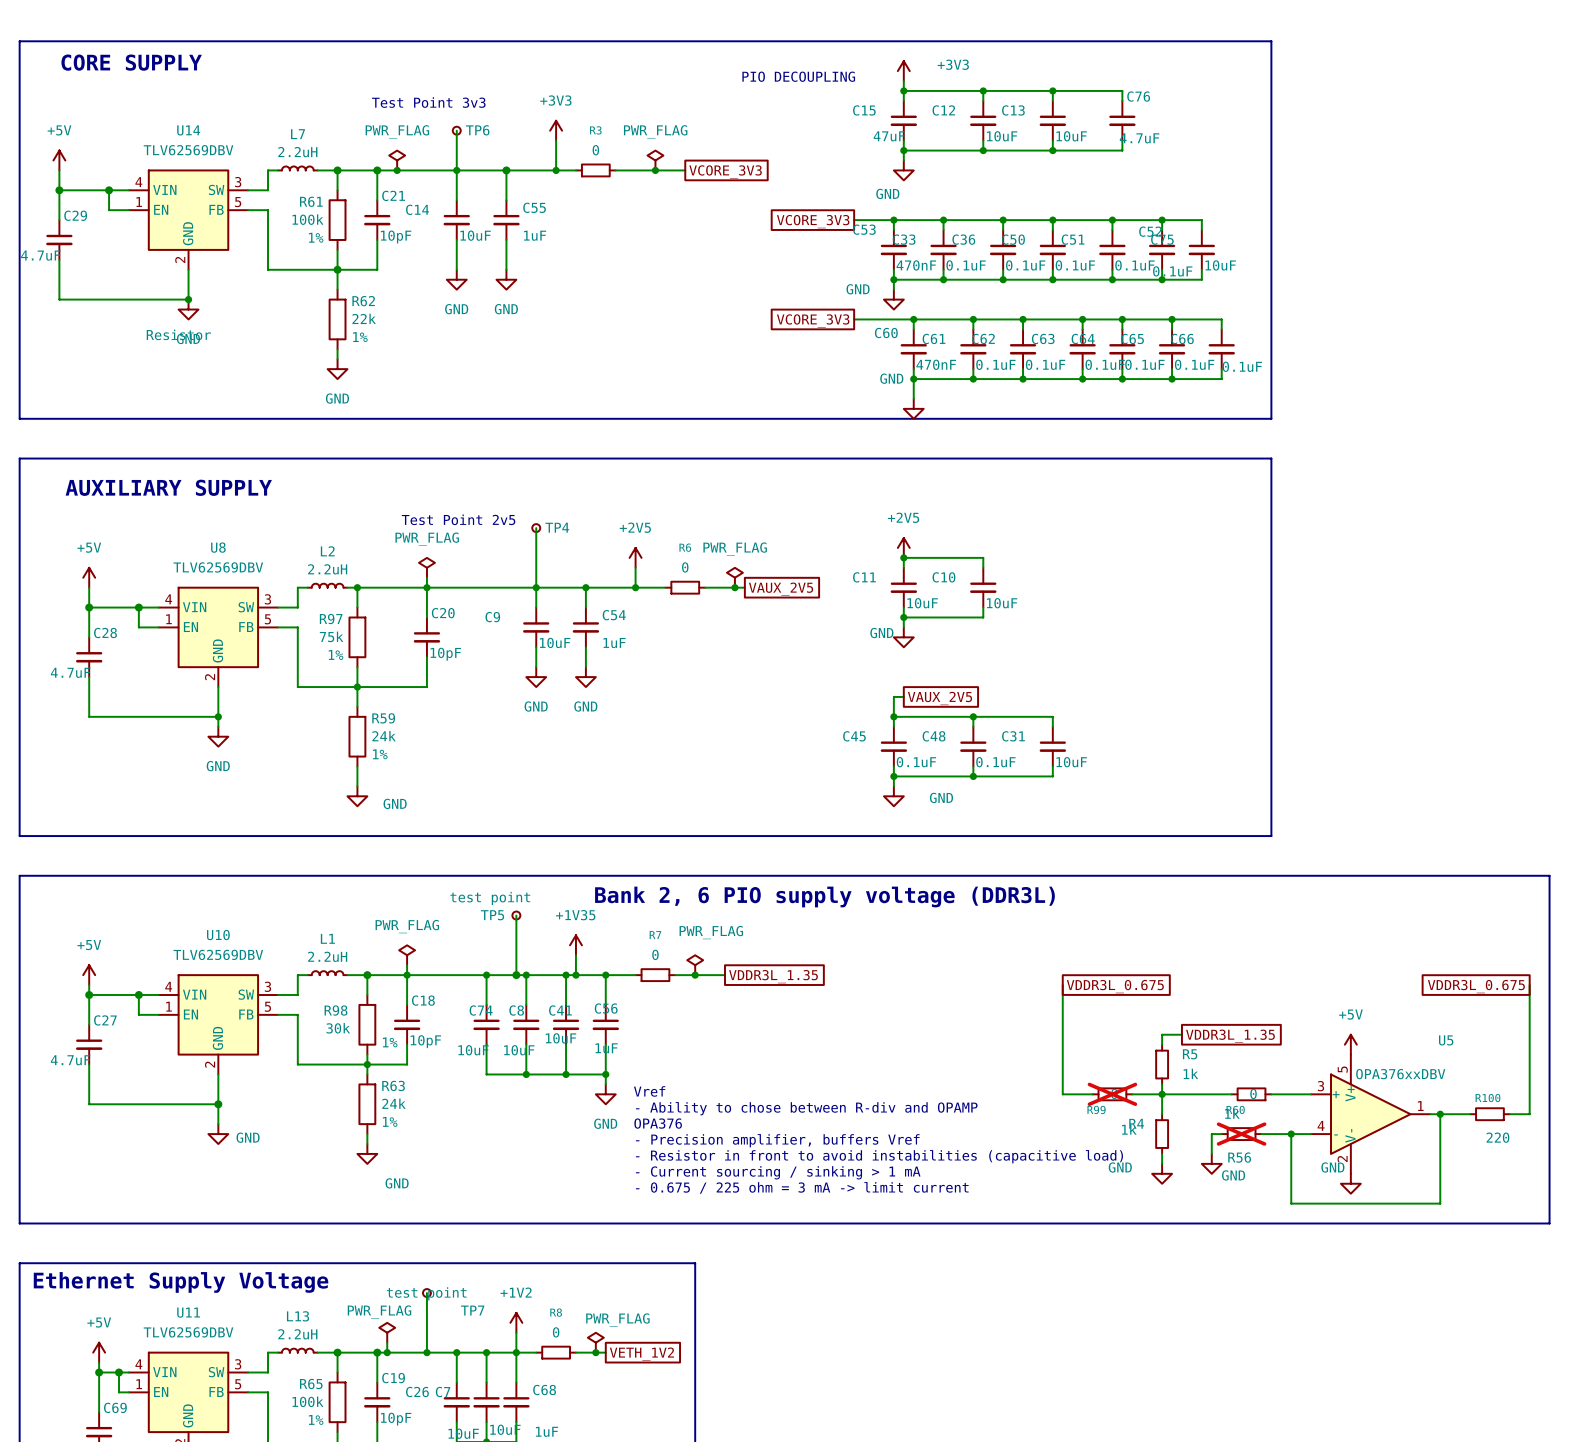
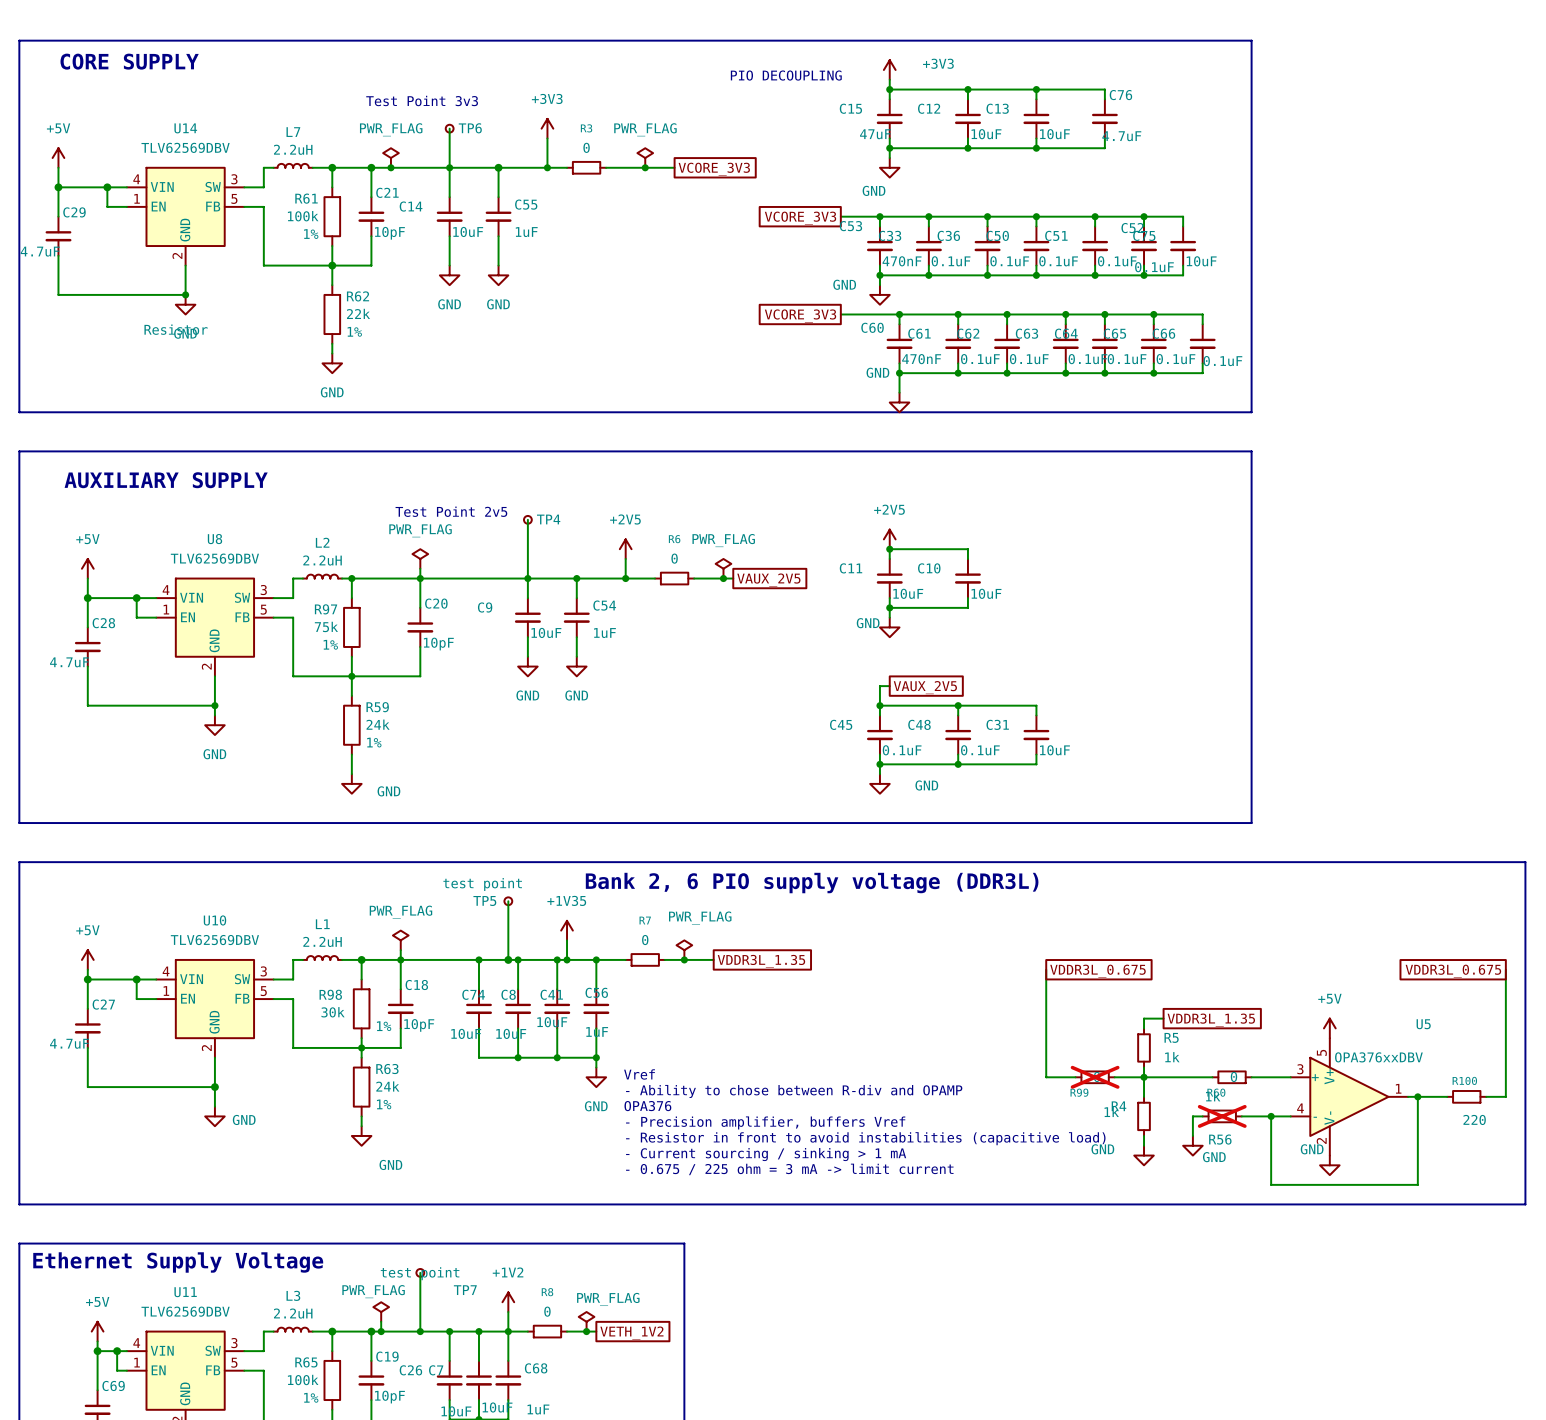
L13 name: L13 (298, 1316) -> L3 (293, 1295)

